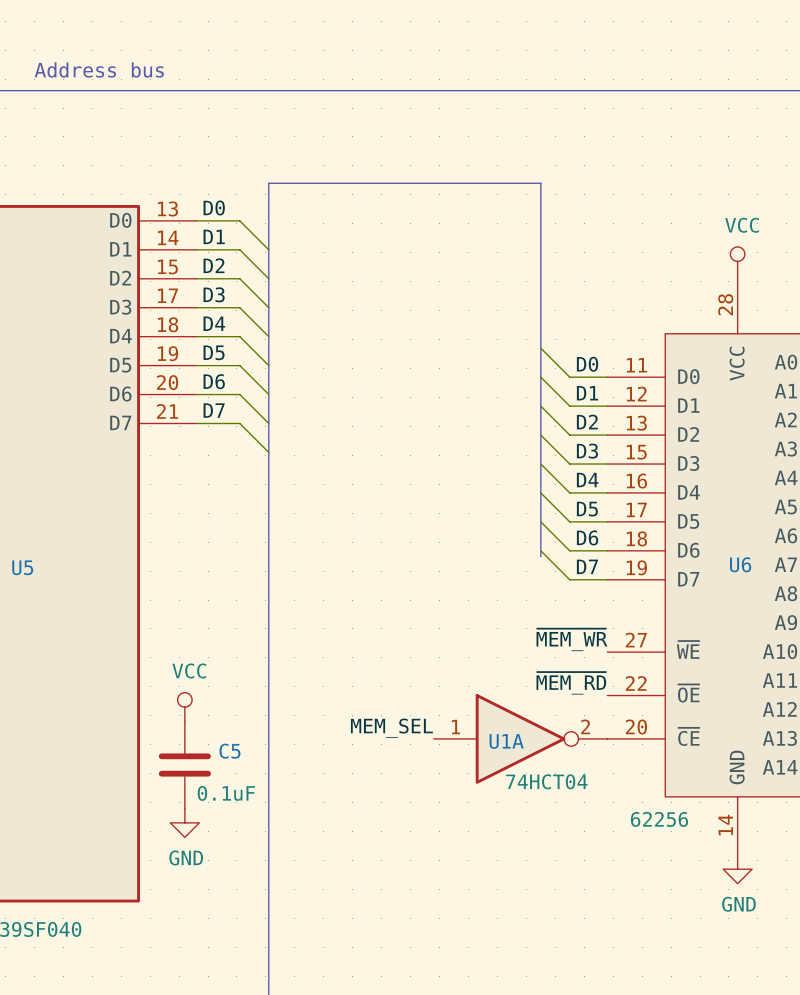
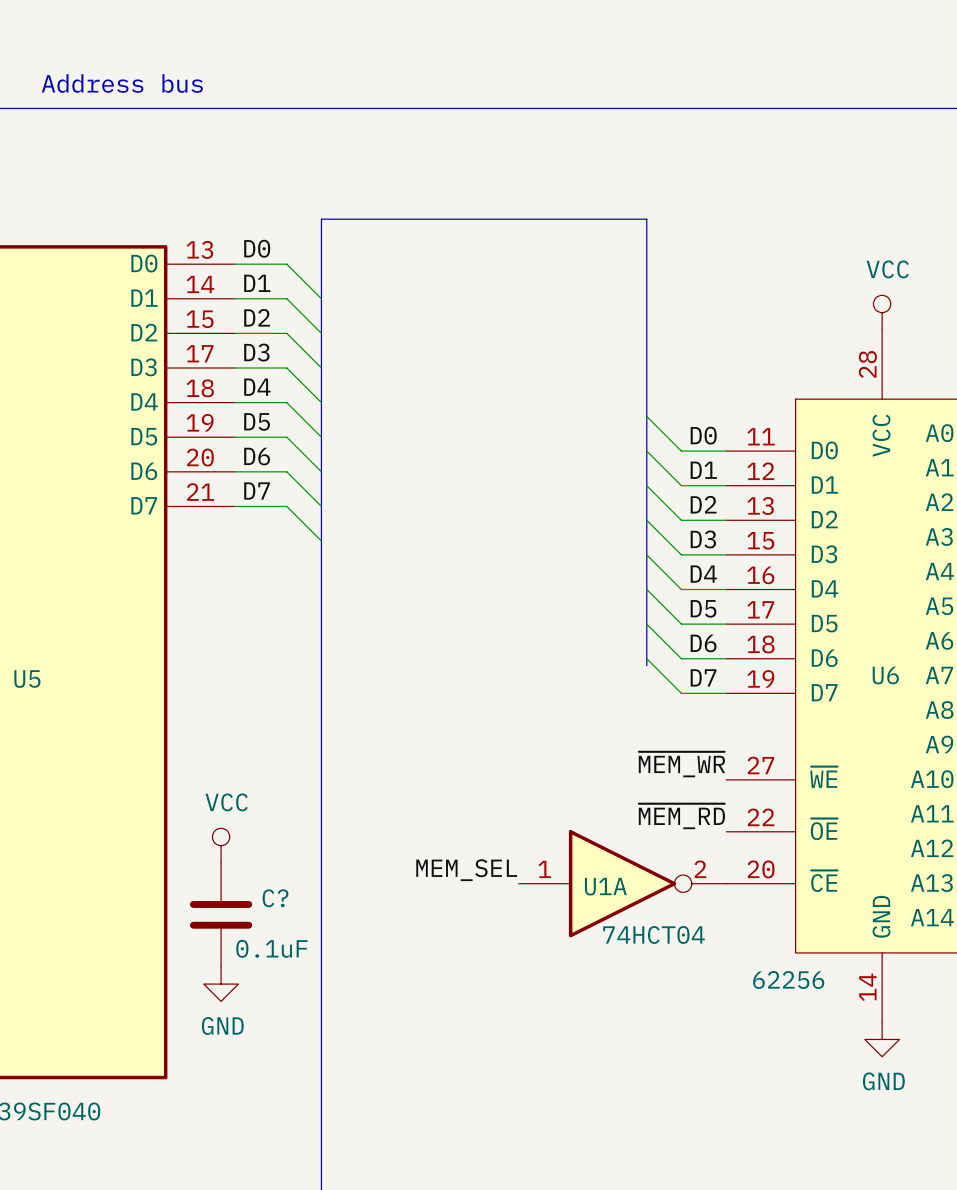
C5 name: C5 (229, 751) -> C? (275, 898)

